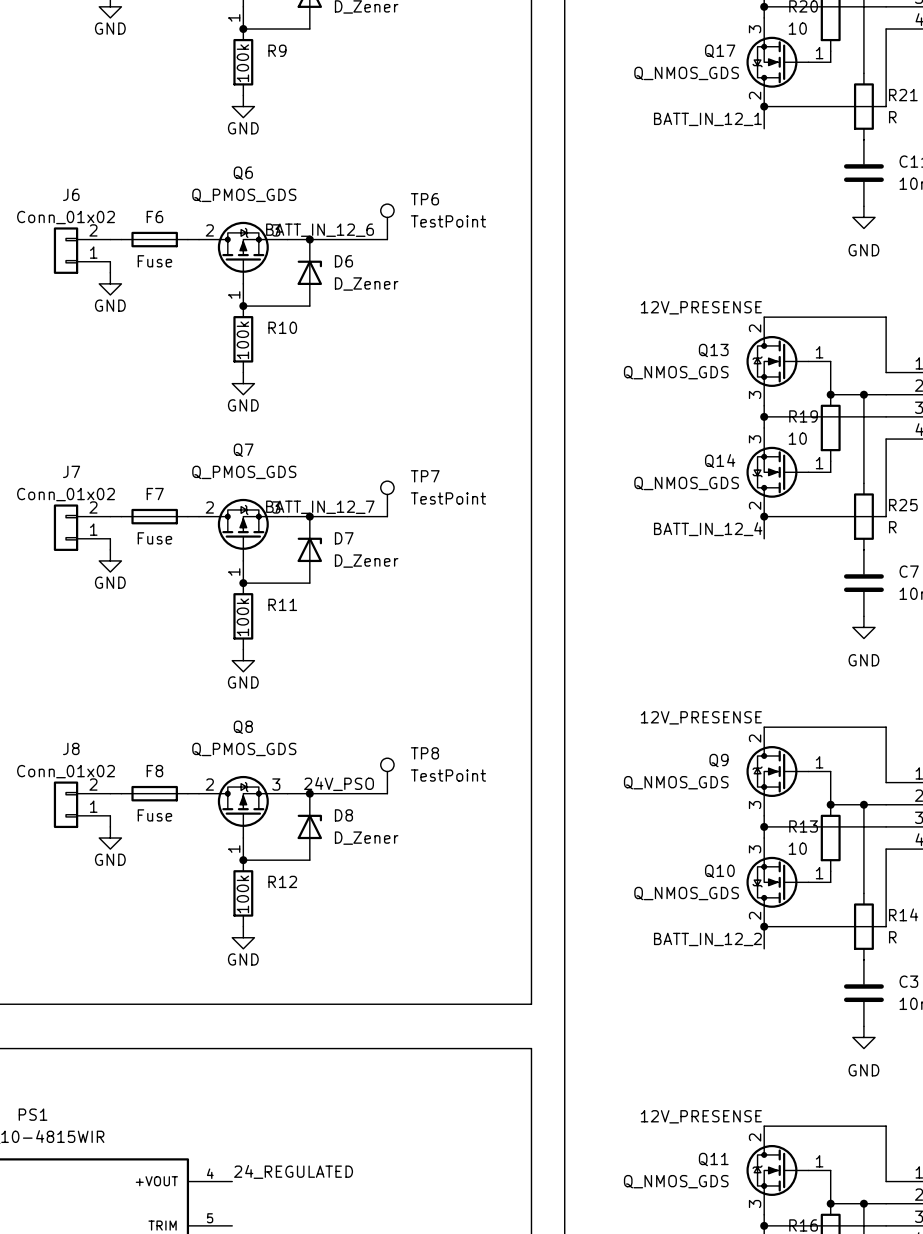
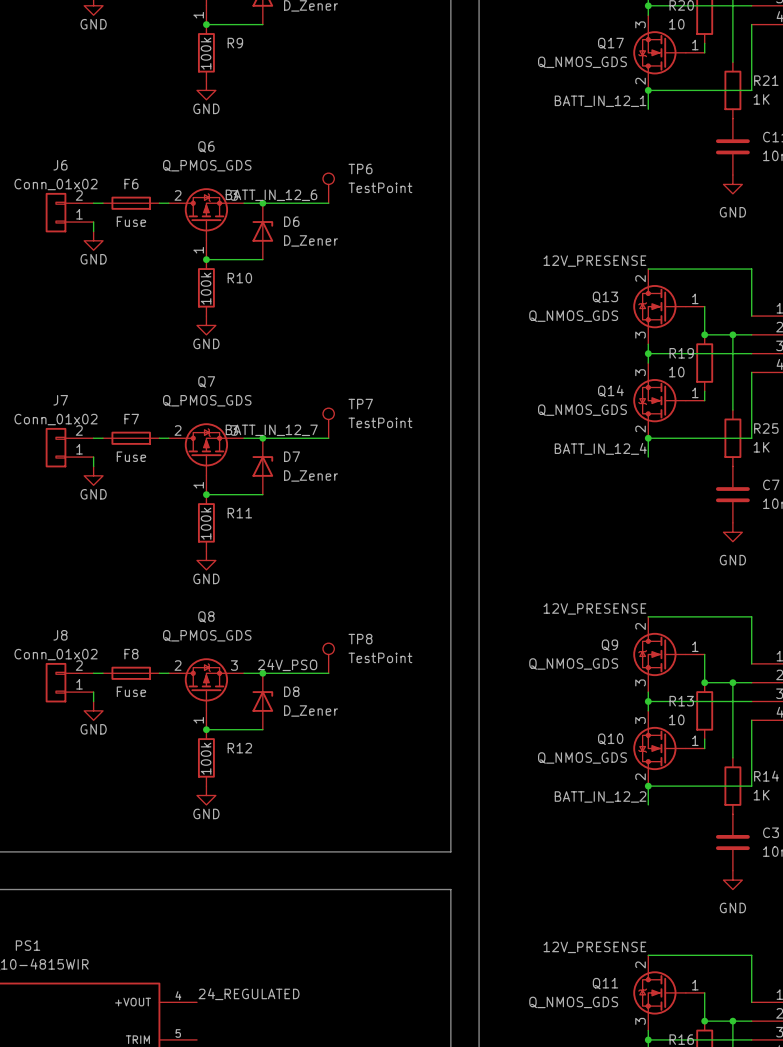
R21 value: R (892, 117) -> 1K (761, 99)
R25 value: R (892, 527) -> 1K (761, 447)
R14 value: R (892, 937) -> 1K (761, 795)

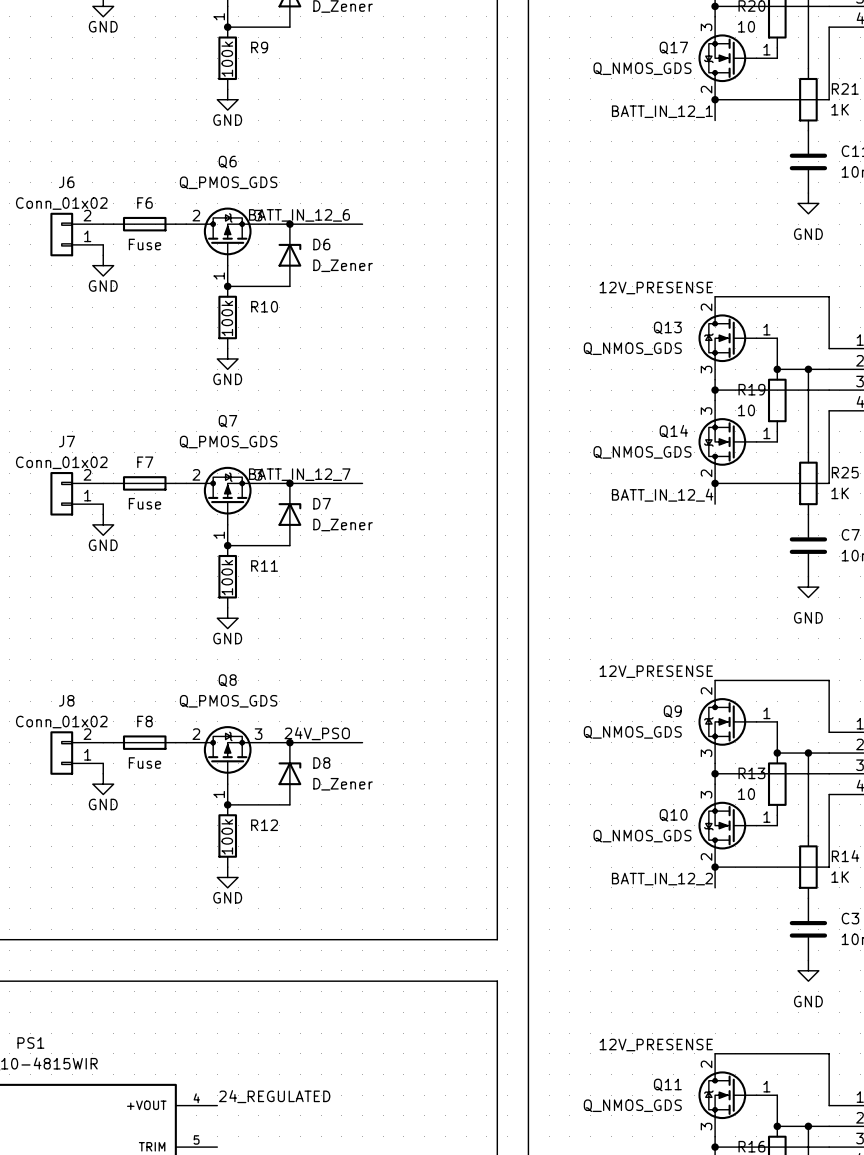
TP6: TestPoint (328, 188) -> none
TP7: TestPoint (328, 423) -> none
TP8: TestPoint (328, 658) -> none

